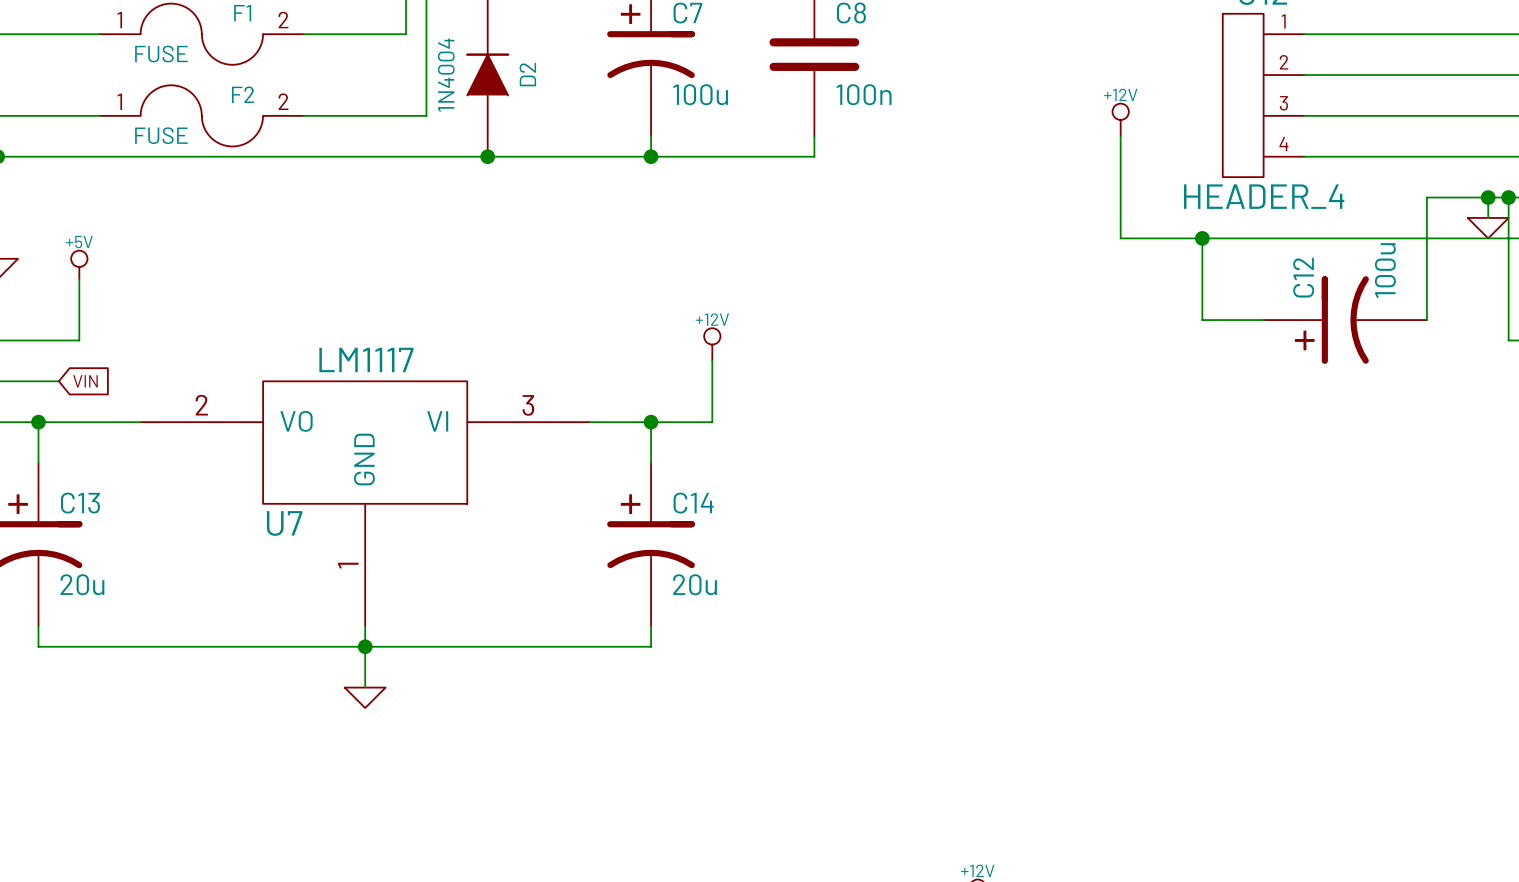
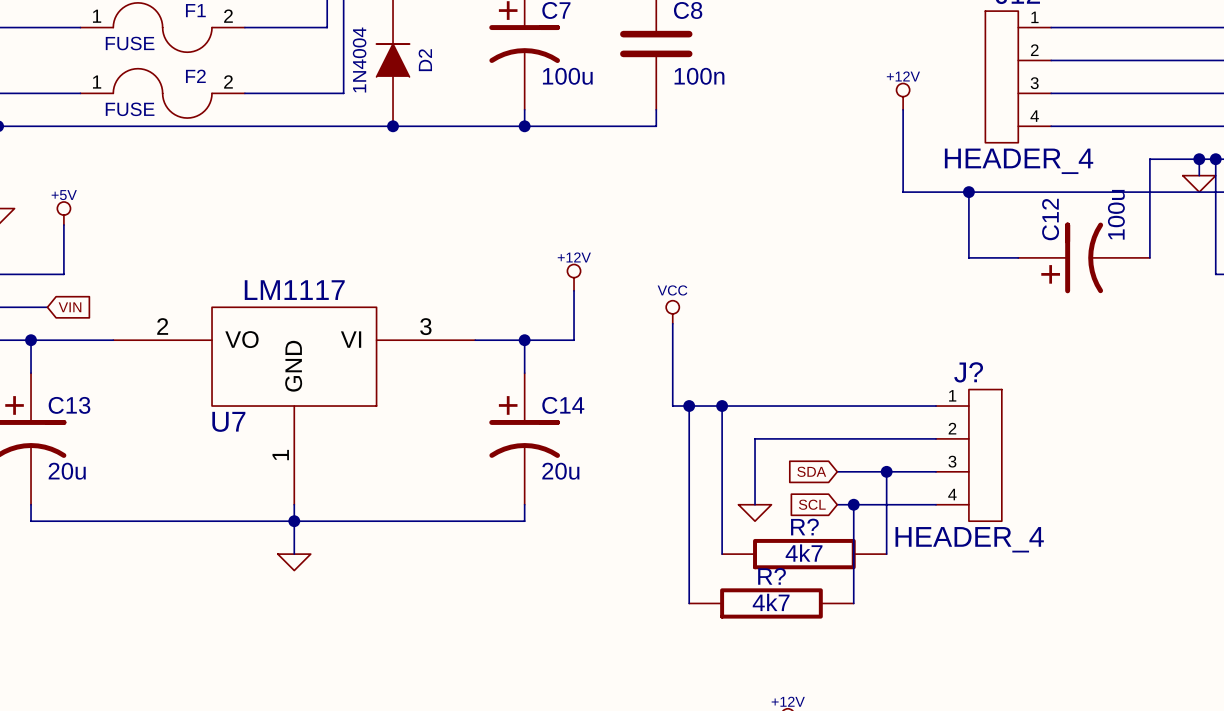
power symbol: none -> VCC (672, 312)
wire: none -> (672, 323) (672, 406) (936, 406)
wire: none -> (689, 406) (689, 603)
junction: none -> (689, 406)
wire: none -> (722, 406) (722, 554)
junction: none -> (722, 406)
wire: none -> (936, 438) (755, 438) (755, 504)
J?: none -> HEADER_4 (968, 455)
global label: none -> SDA (811, 471)
wire: none -> (837, 471) (936, 471)
wire: none -> (886, 471) (886, 554)
junction: none -> (886, 471)
global label: none -> SCL (812, 504)
wire: none -> (837, 504) (936, 504)
wire: none -> (853, 504) (853, 603)
junction: none -> (853, 504)
power symbol: none -> (755, 512)
R?: none -> 4k7 (804, 554)
R?: none -> 4k7 (771, 603)

